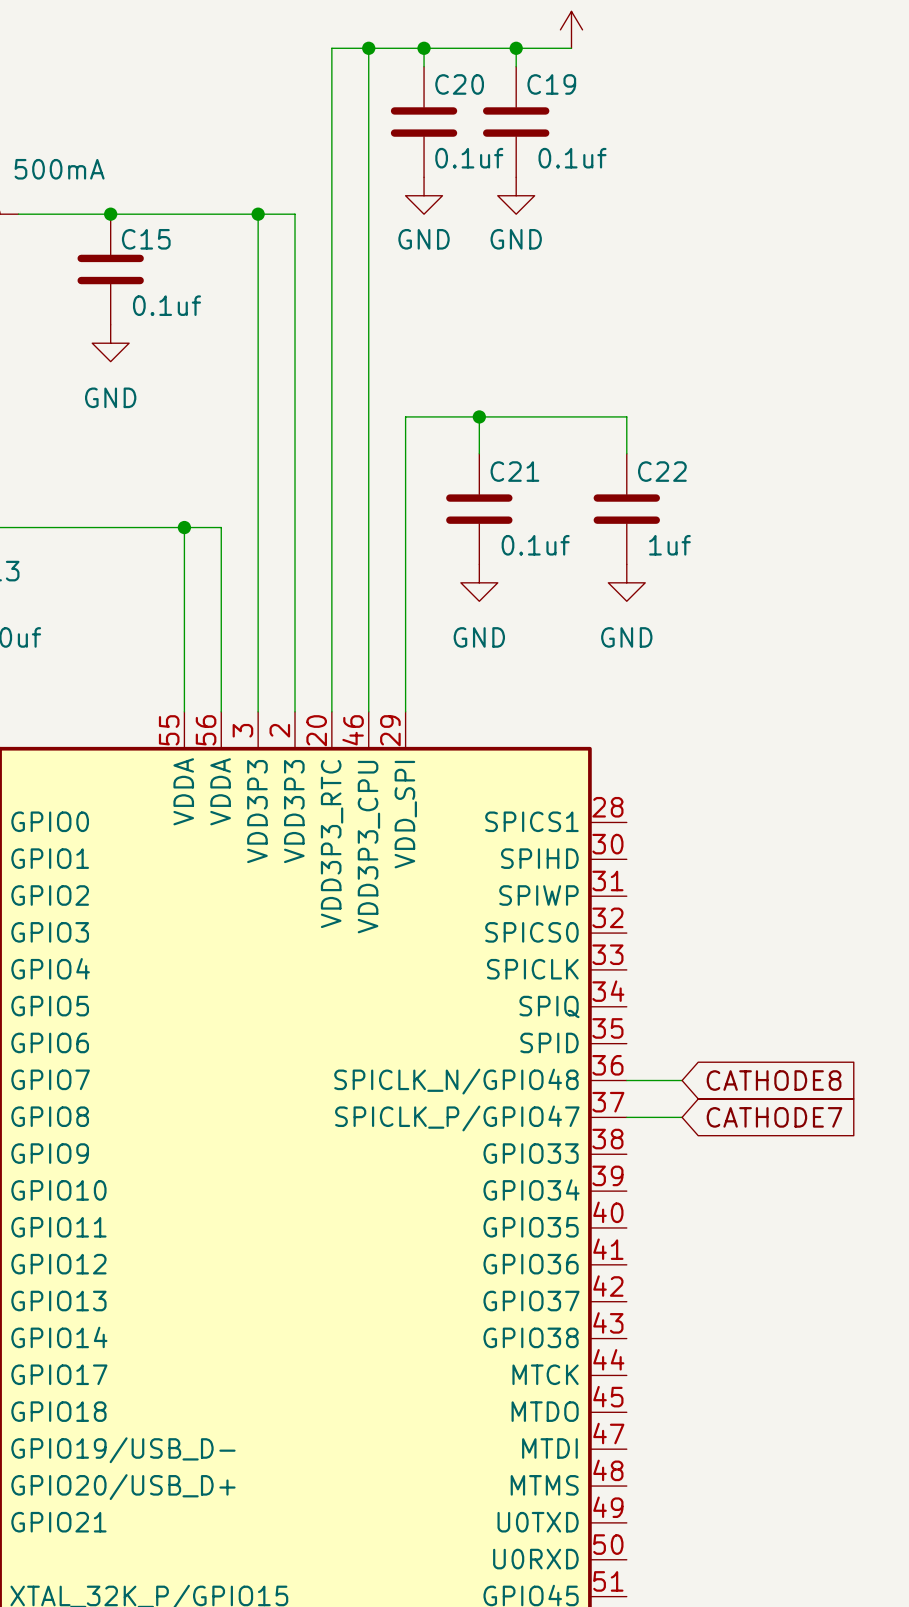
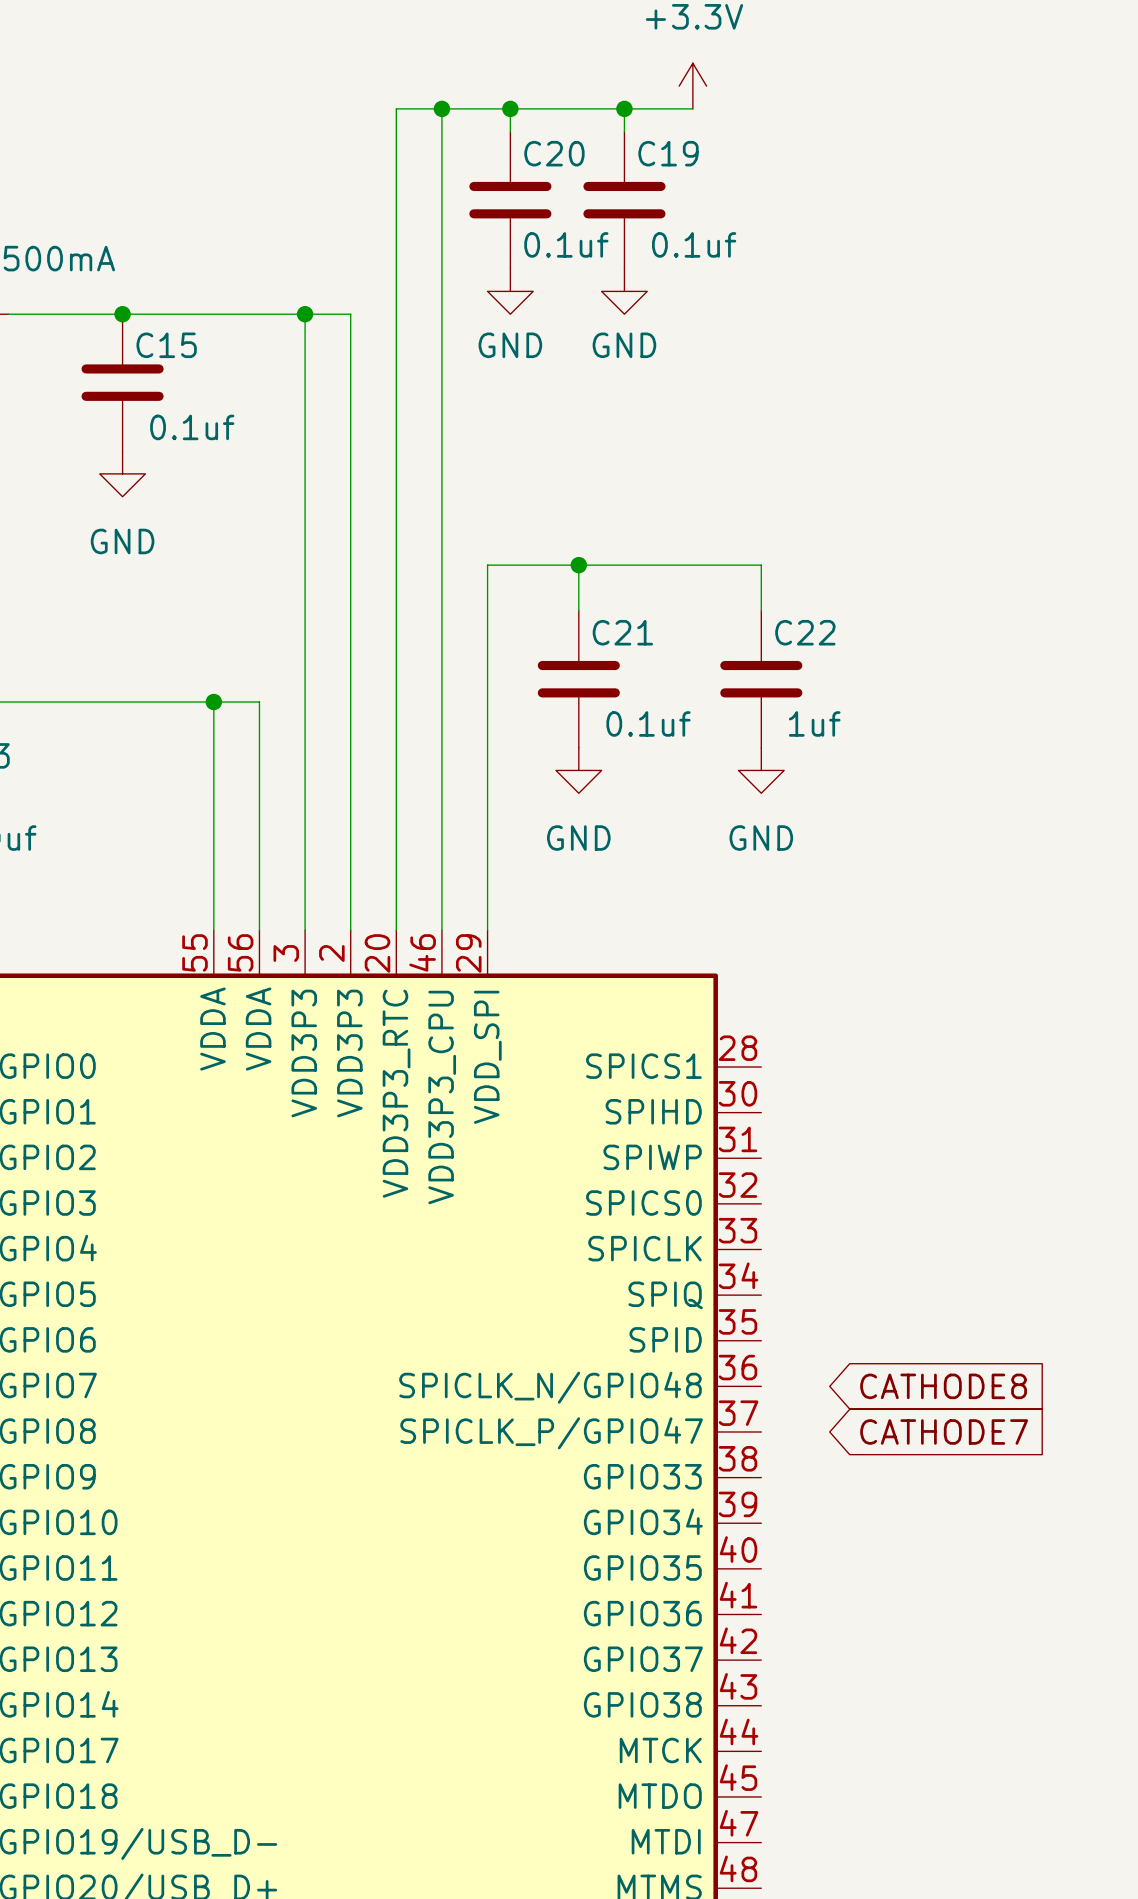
wire: (626, 1080) (682, 1080) -> none
wire: (626, 1117) (682, 1117) -> none

